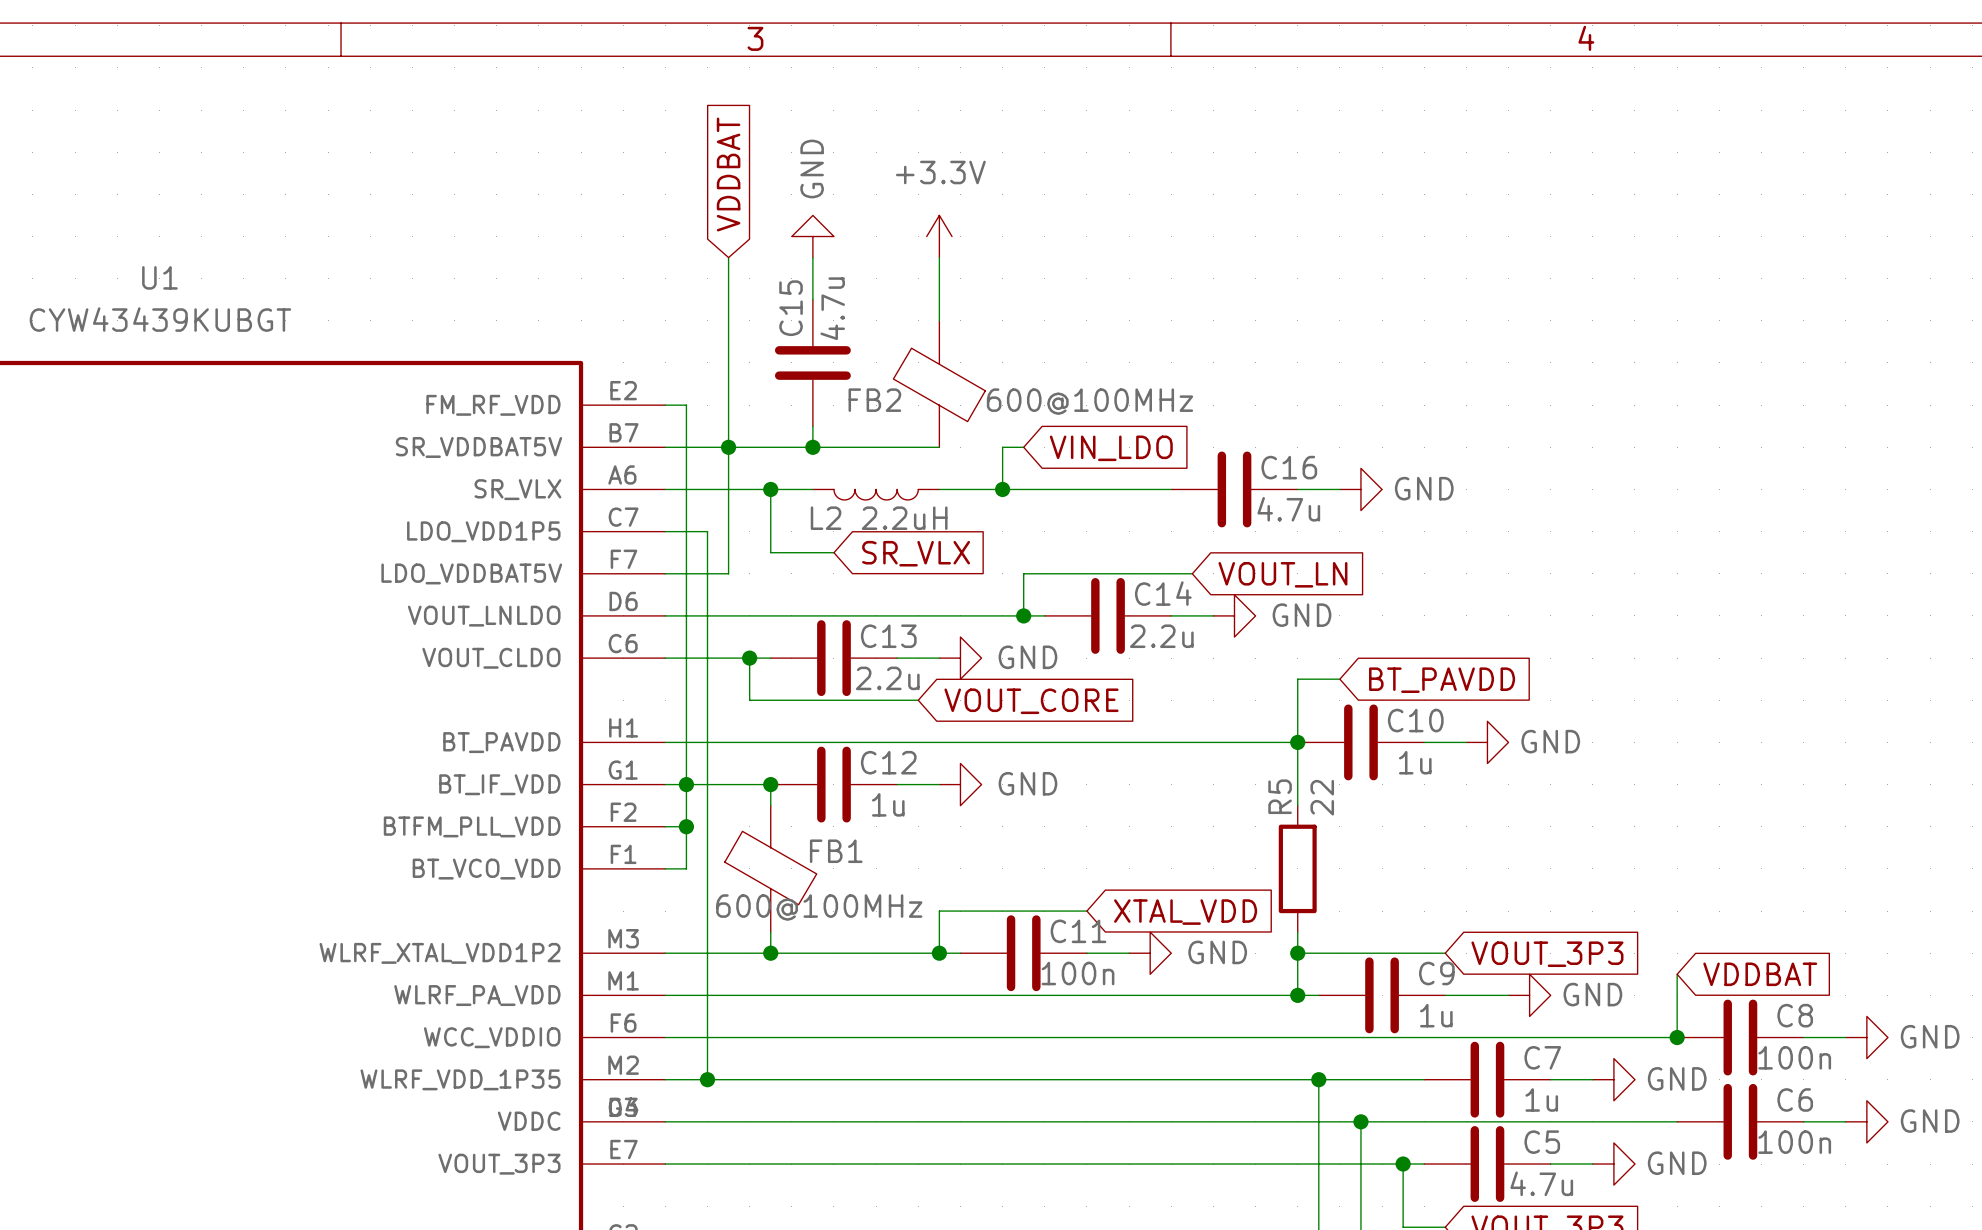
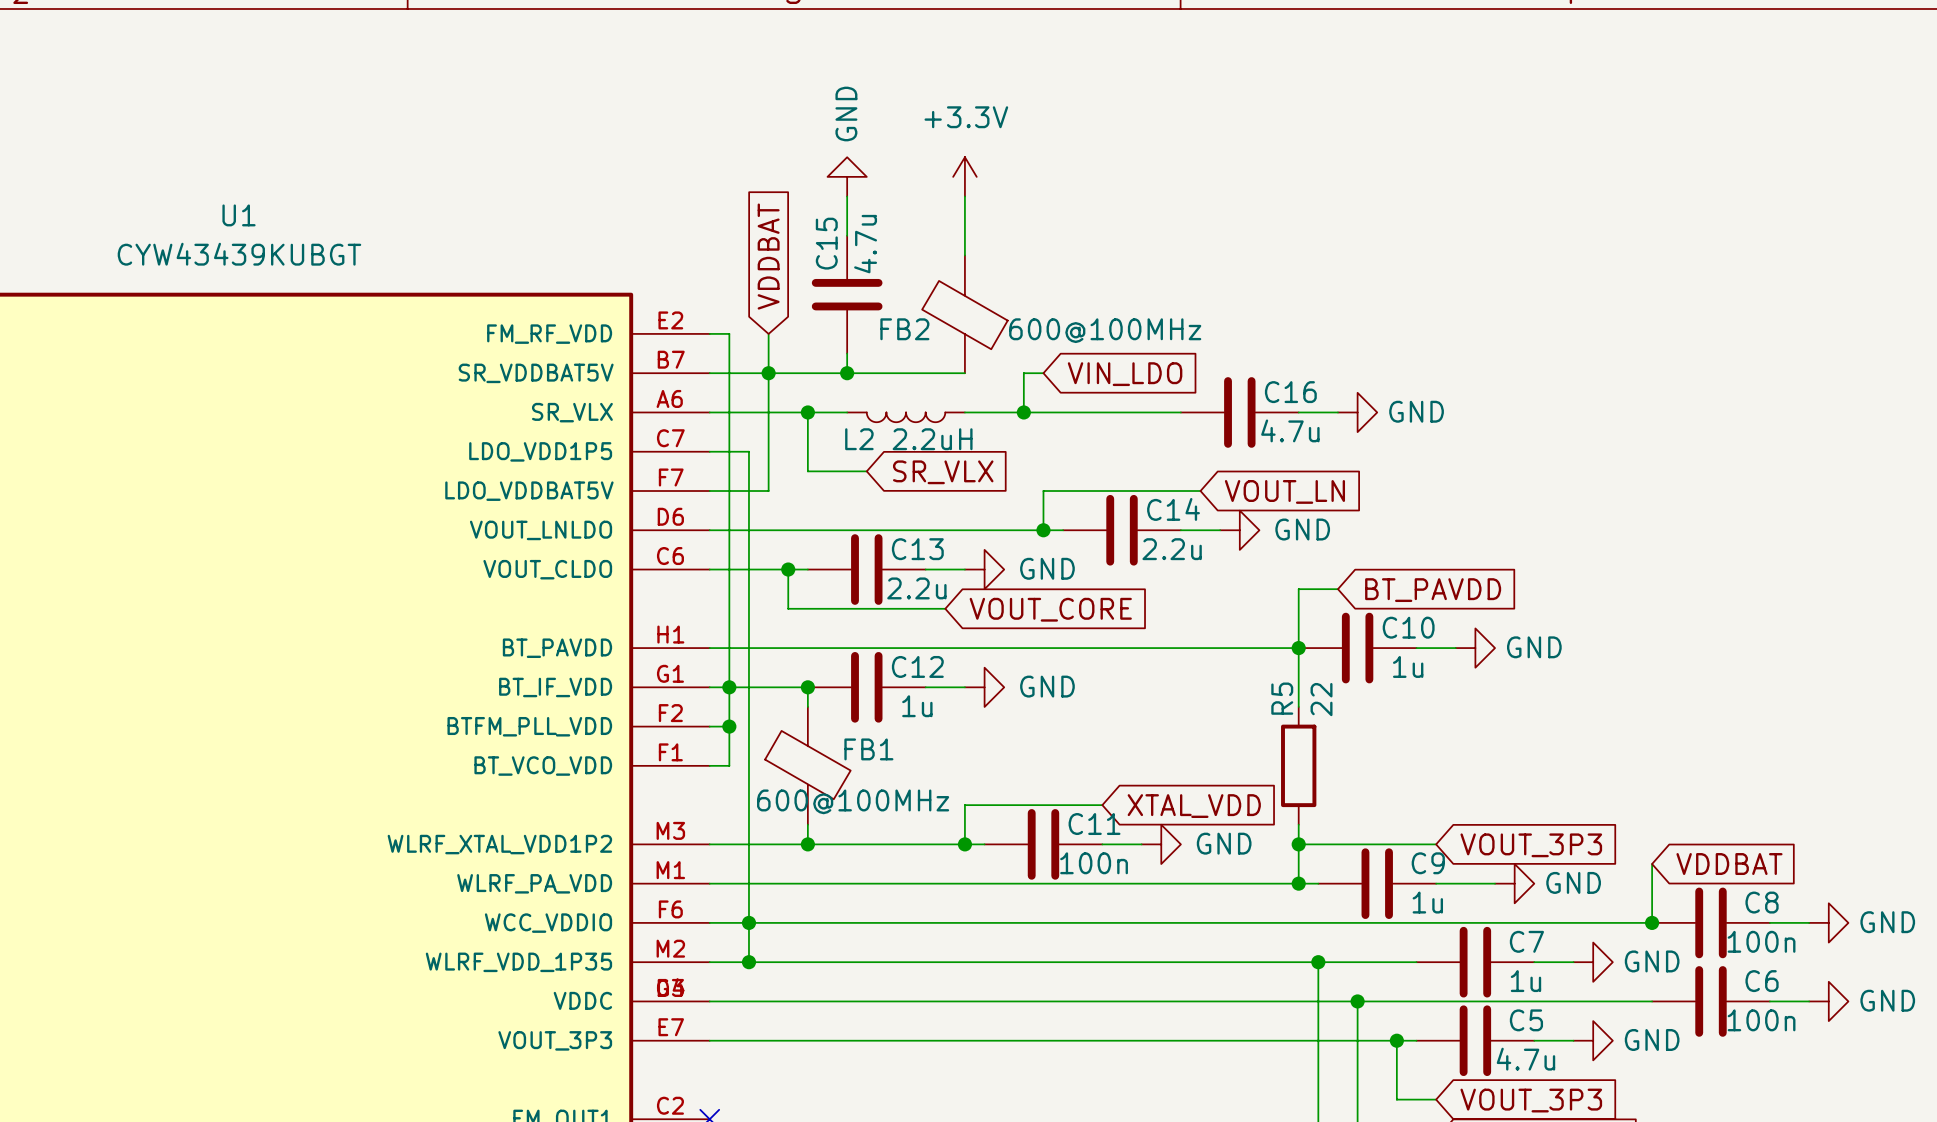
global label position: VDDBAT (728, 174) -> VDDBAT (768, 256)
wire: (728, 257) (728, 405) -> none
junction: none -> (748, 922)

